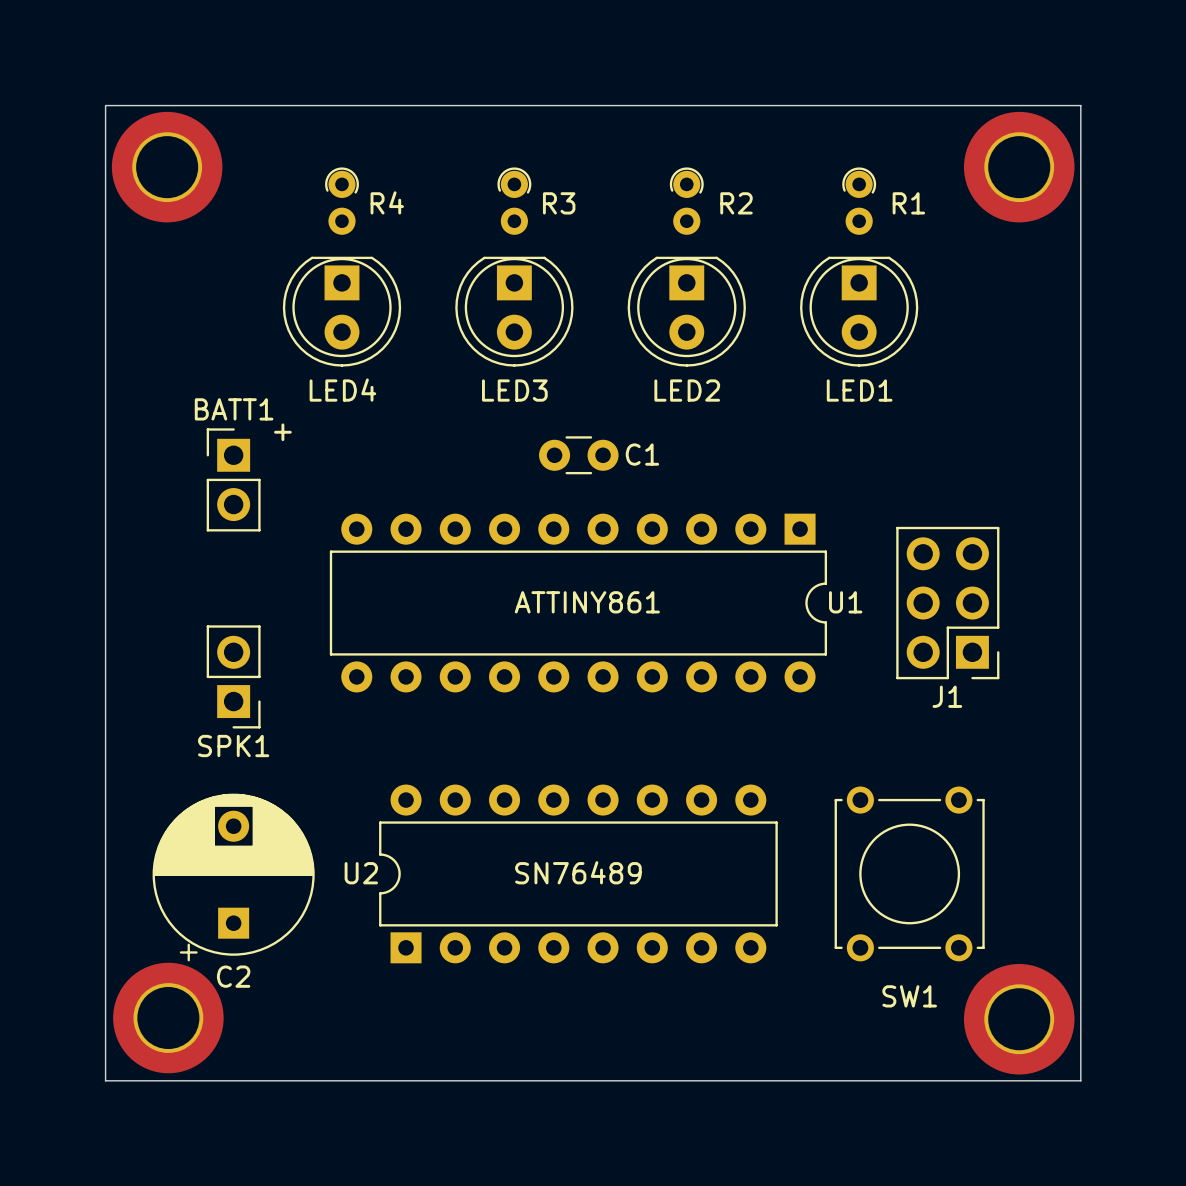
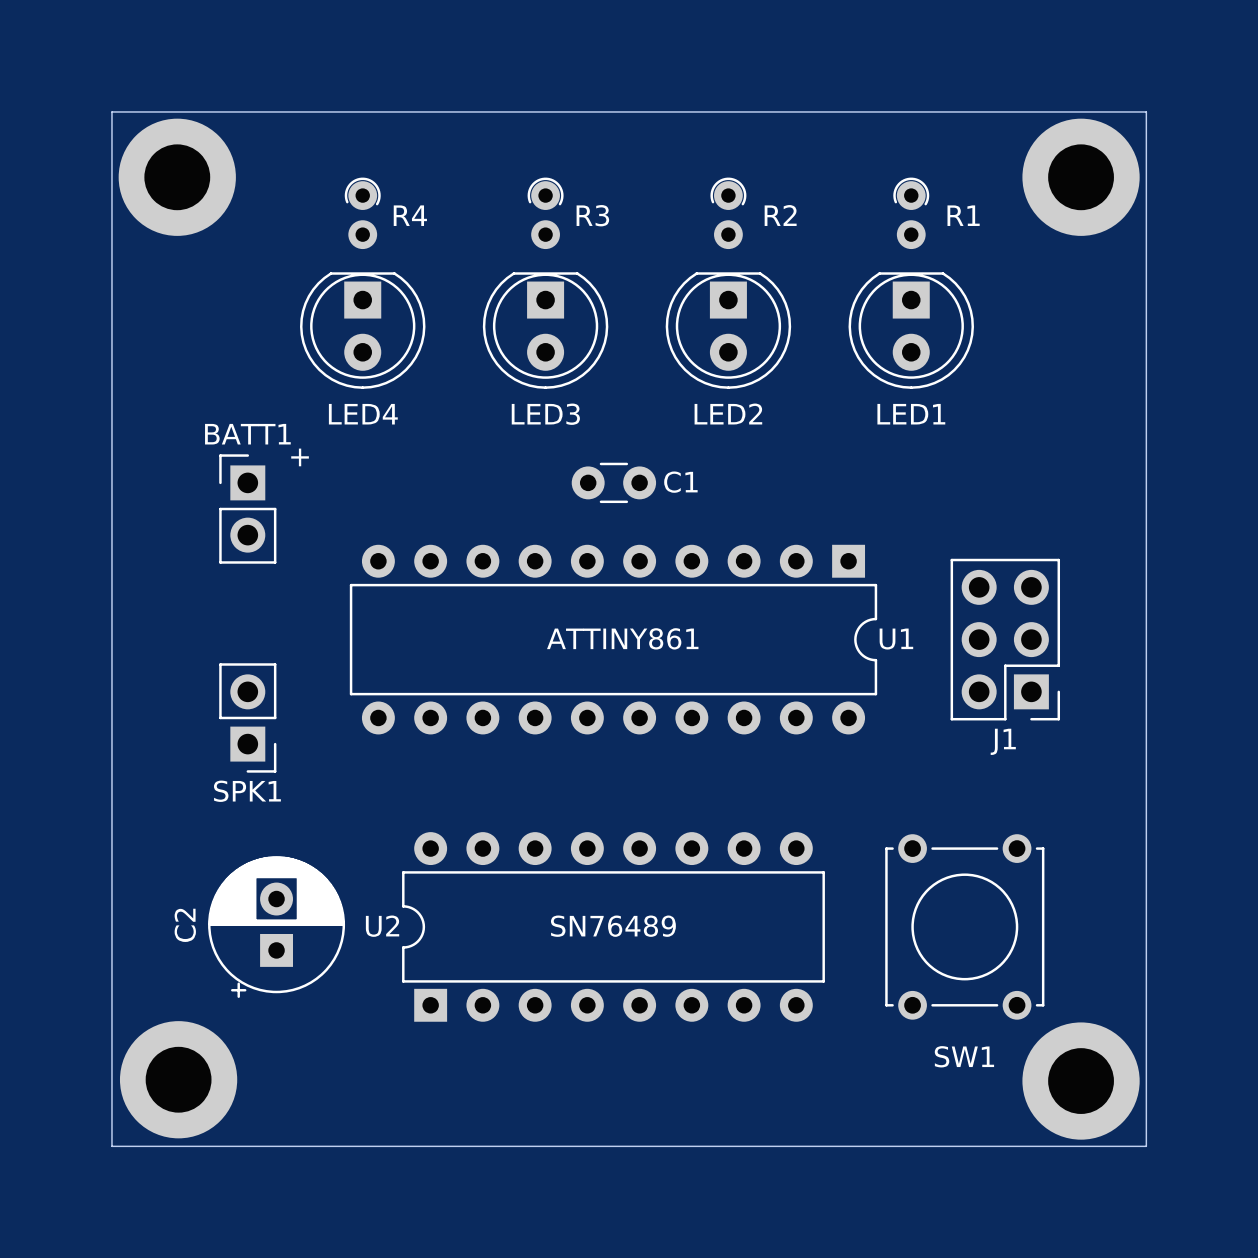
C2 footprint: [152, 793, 315, 962] -> [208, 856, 346, 998]
C2 name position: C2 (233, 976) -> C2 (185, 925)

